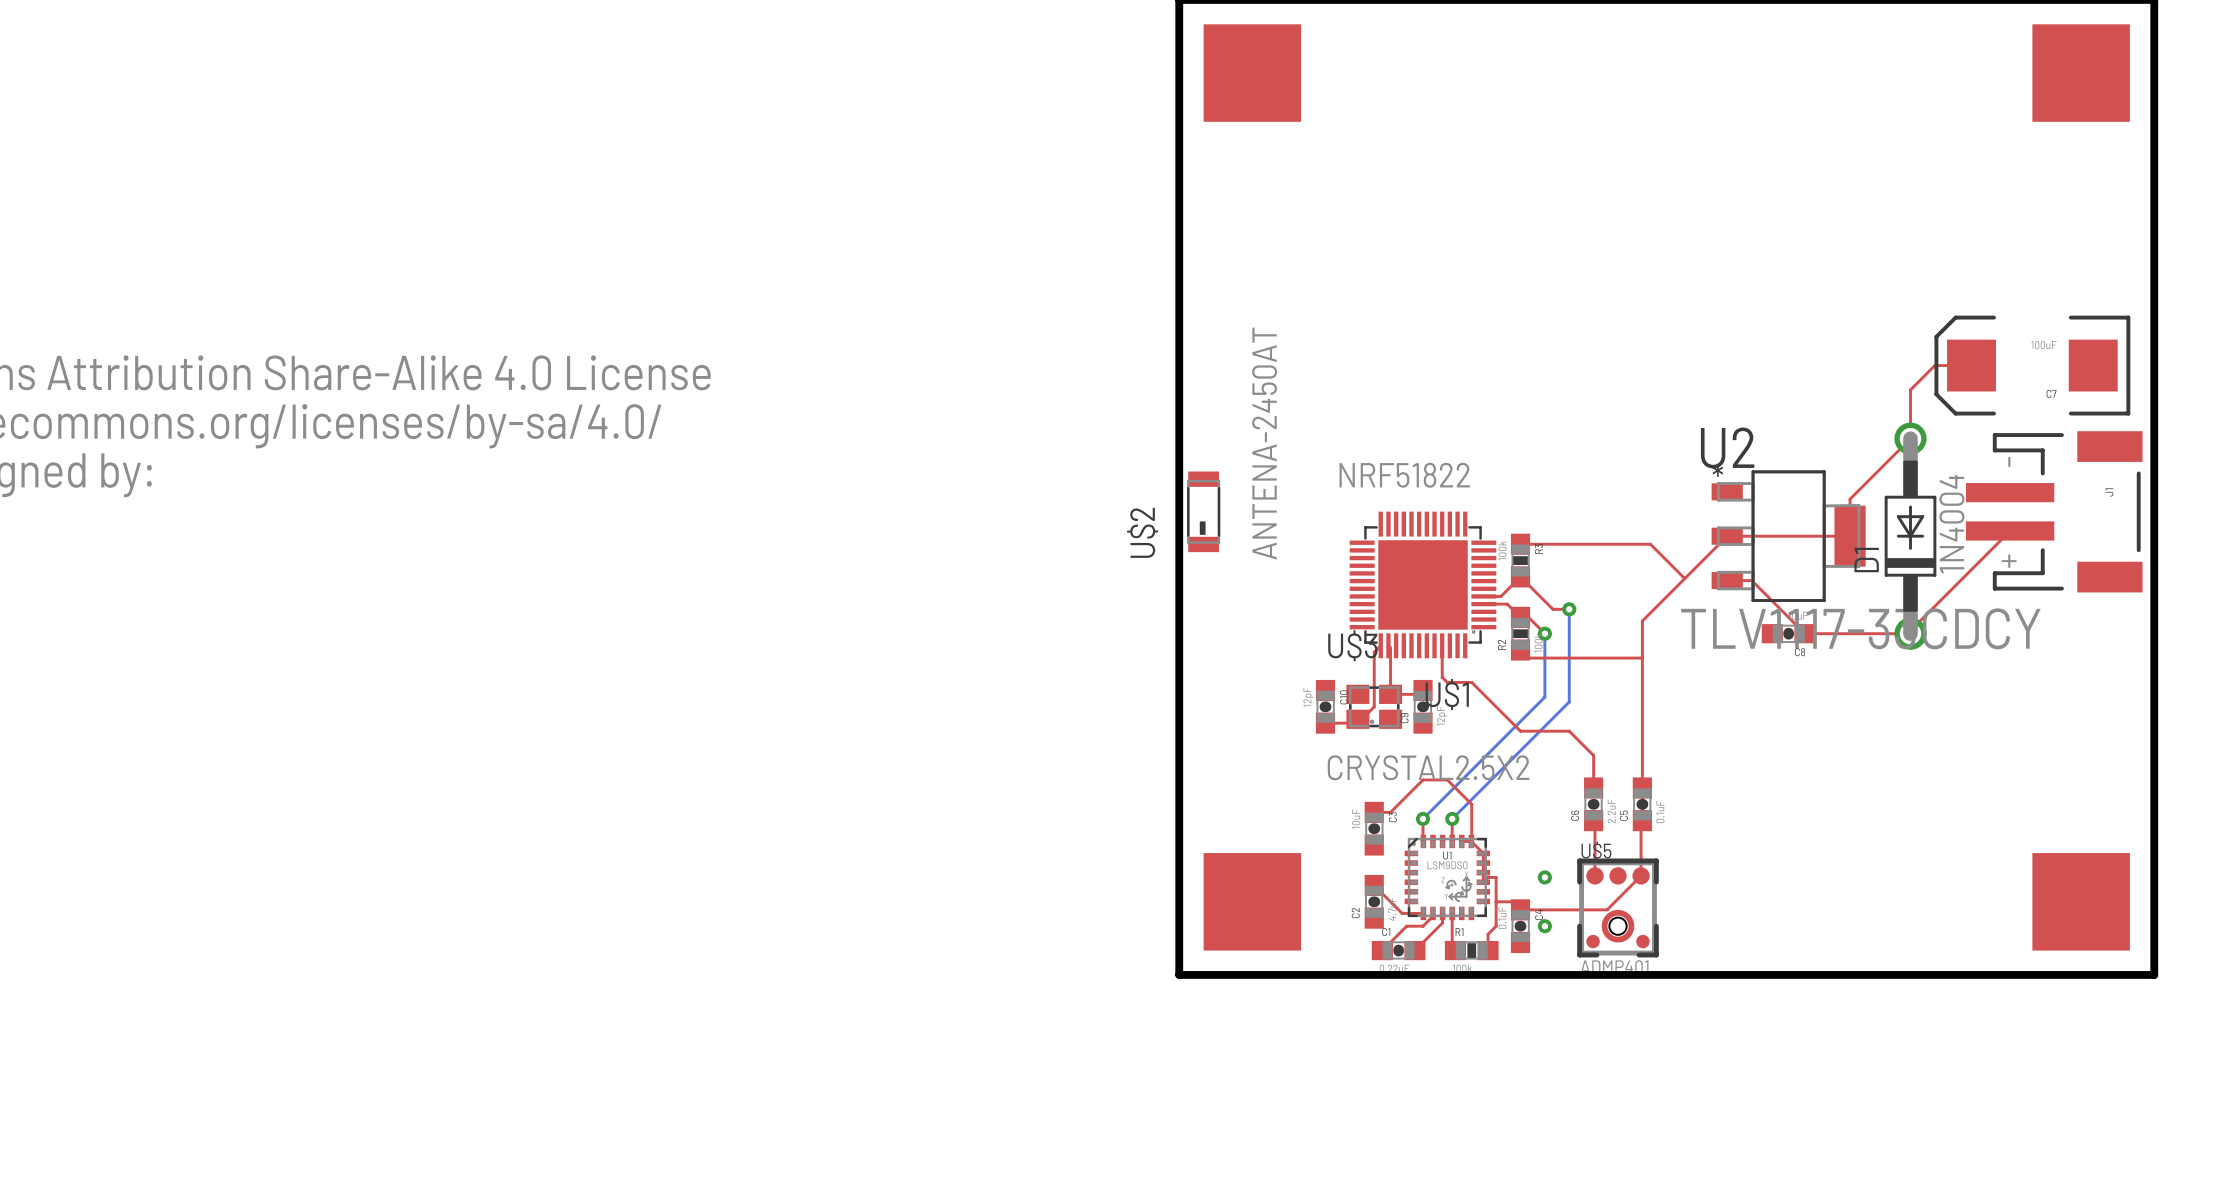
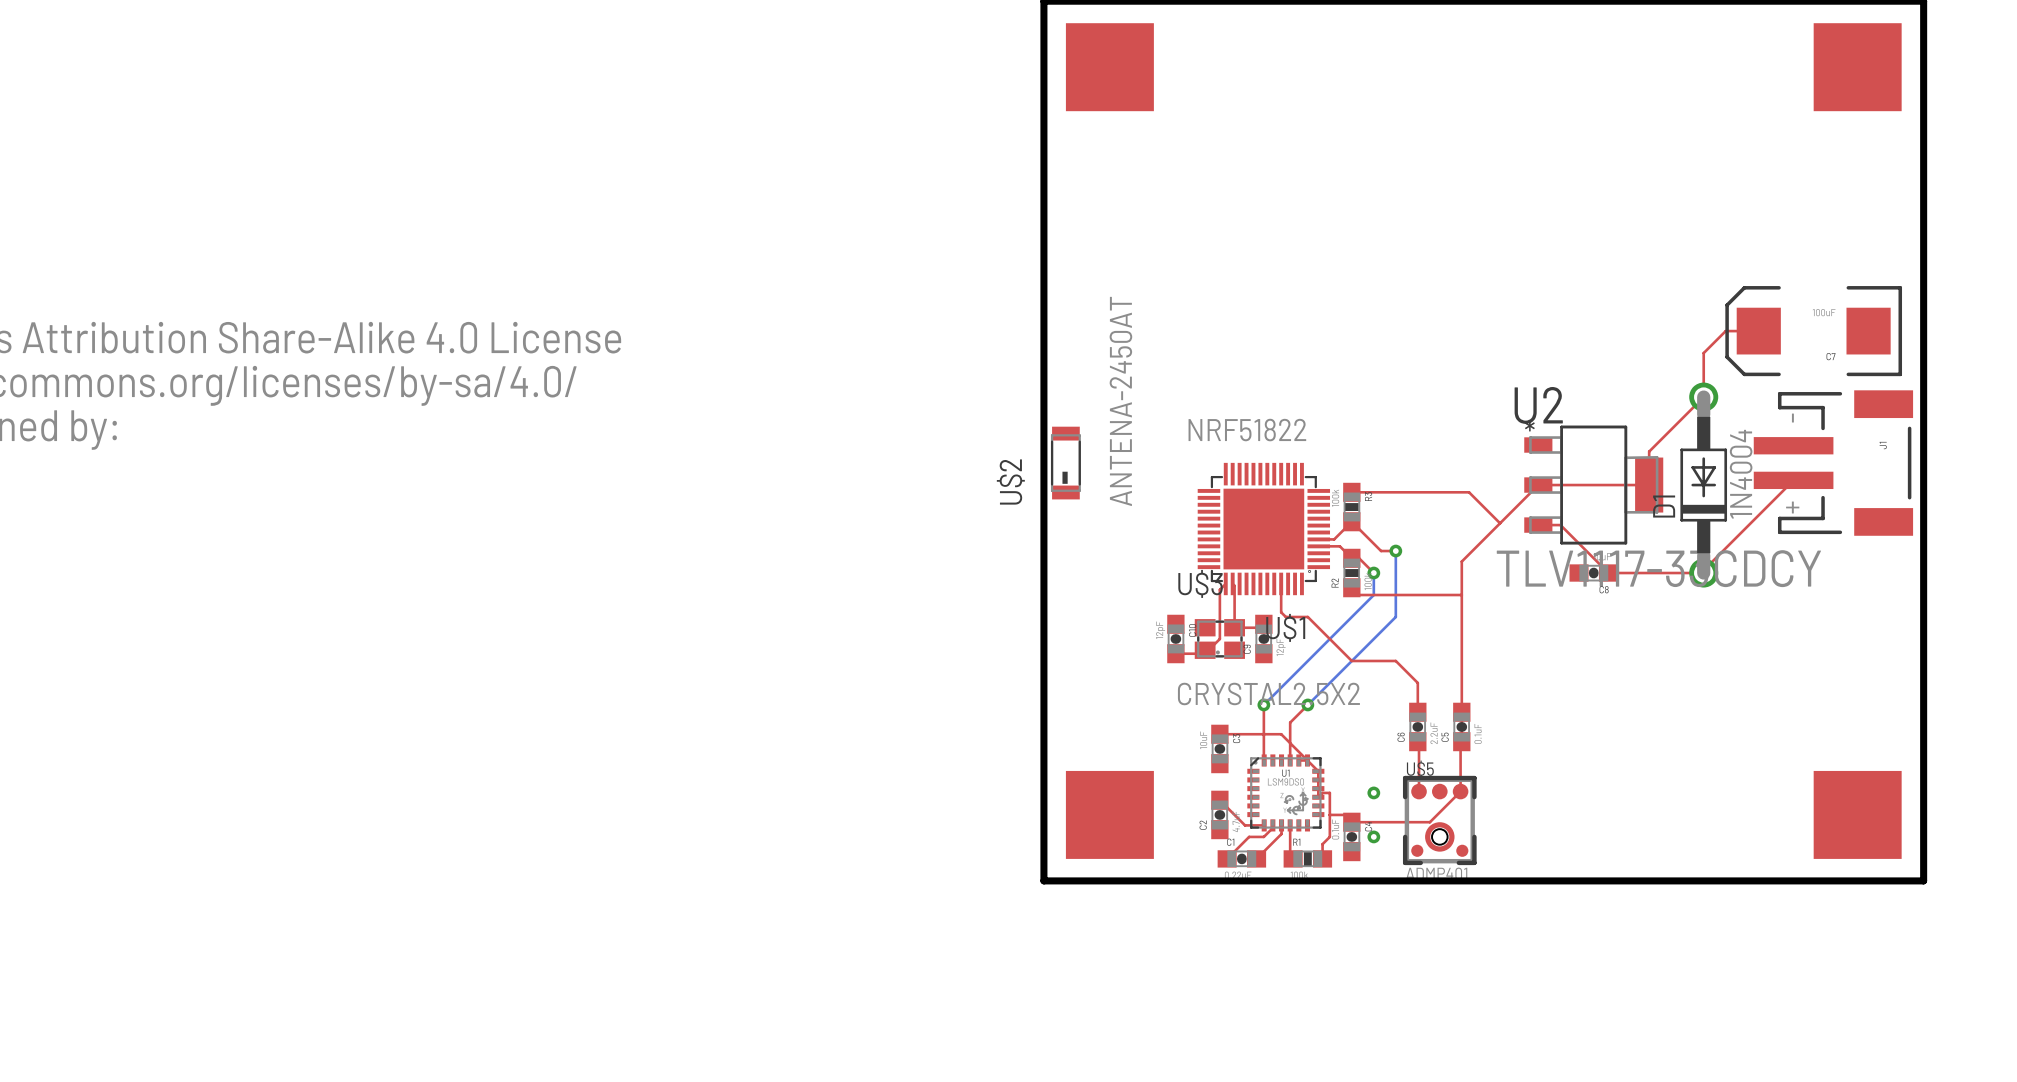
bottom track: (1544, 658) (1544, 697) (1423, 818) -> (1373, 595) (1263, 704)
bottom track: (1569, 682) (1569, 701) (1452, 818) -> (1395, 617) (1307, 704)
top track: none -> (1263, 704) (1263, 740)
via: none -> (1263, 704)
top track: none -> (1307, 704) (1290, 722) (1290, 740)
via: none -> (1307, 704)
top track: (1390, 812) (1423, 779) (1447, 779) (1471, 804) (1471, 841) -> (1234, 734) (1281, 734) (1307, 760)
via: (1423, 818) -> none
via: (1452, 818) -> none

